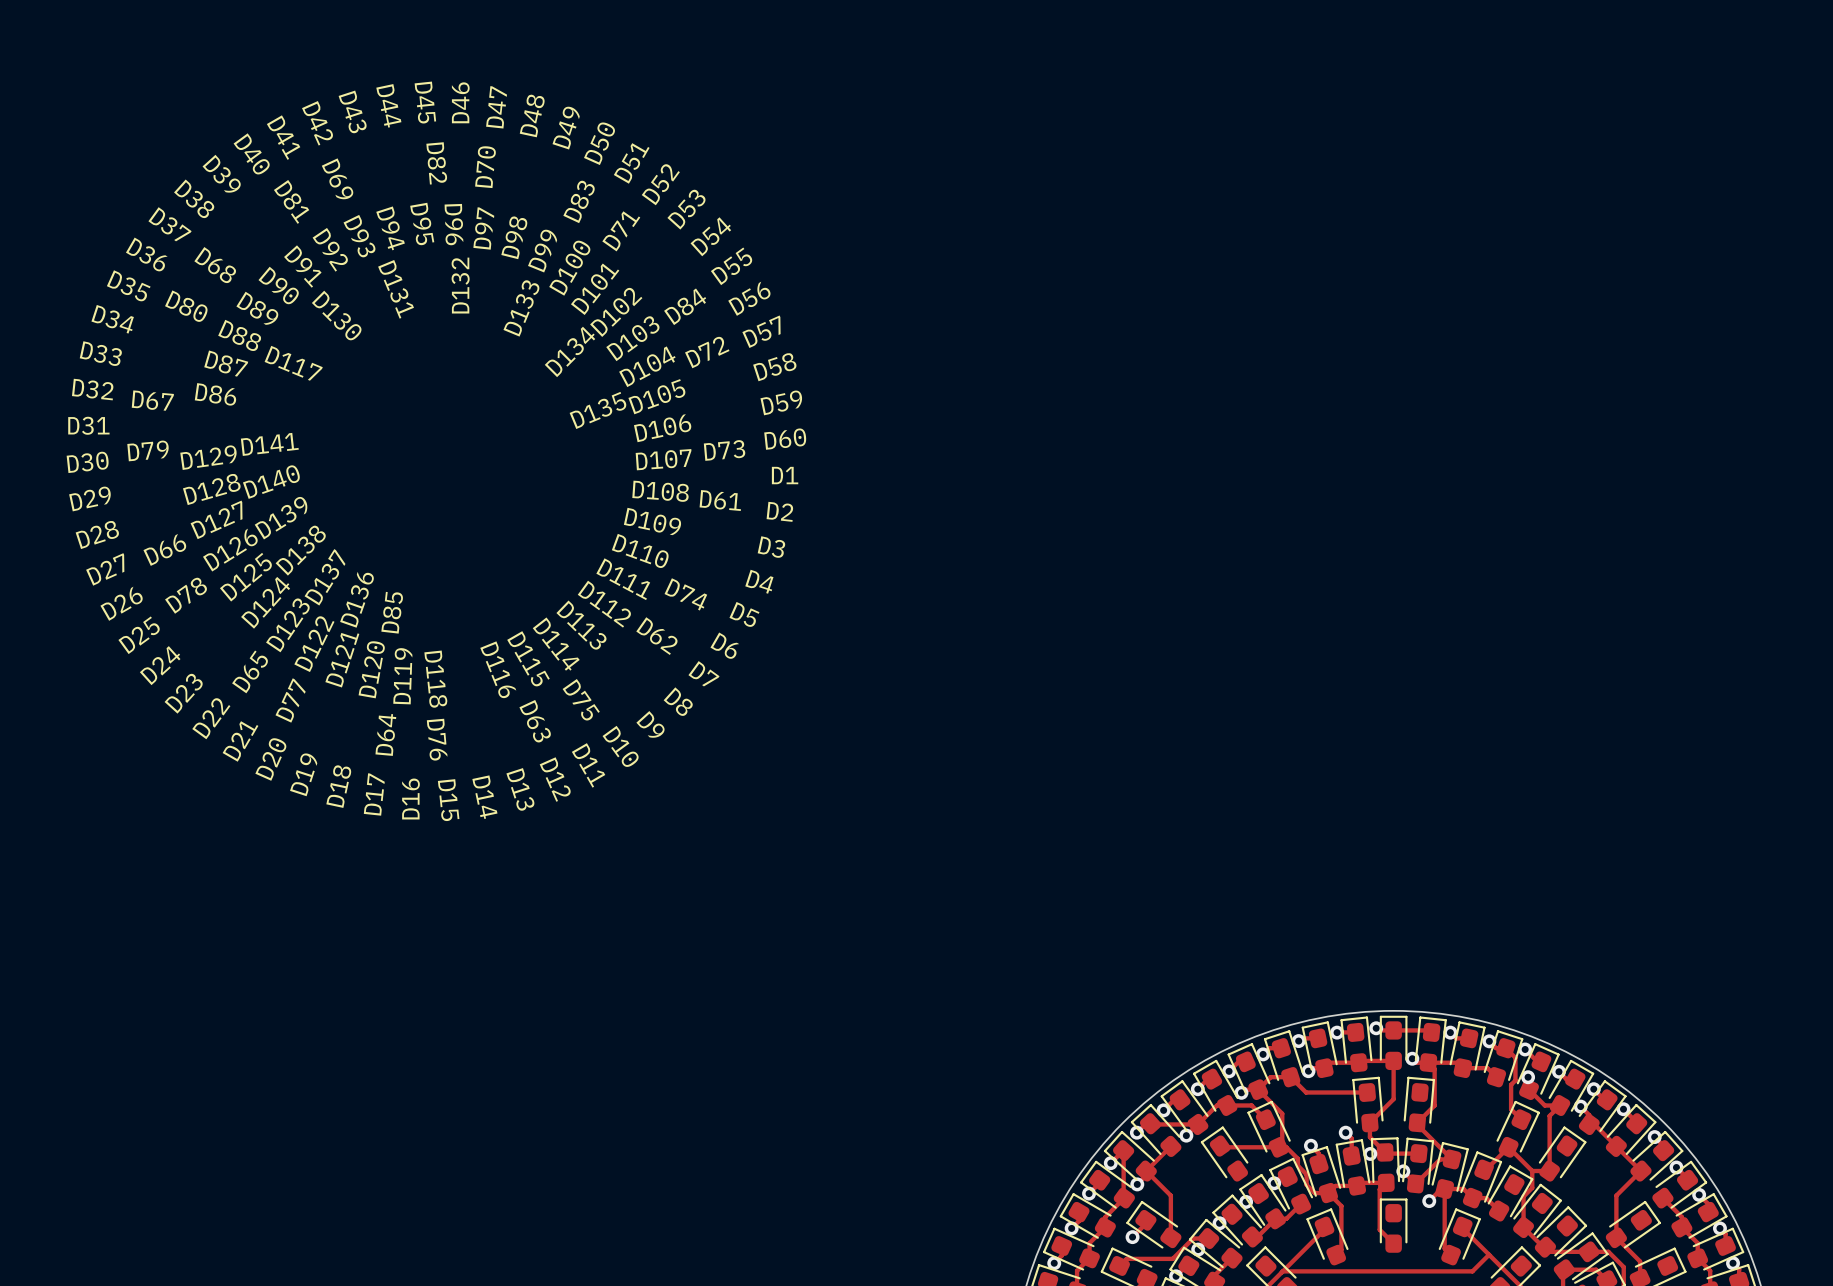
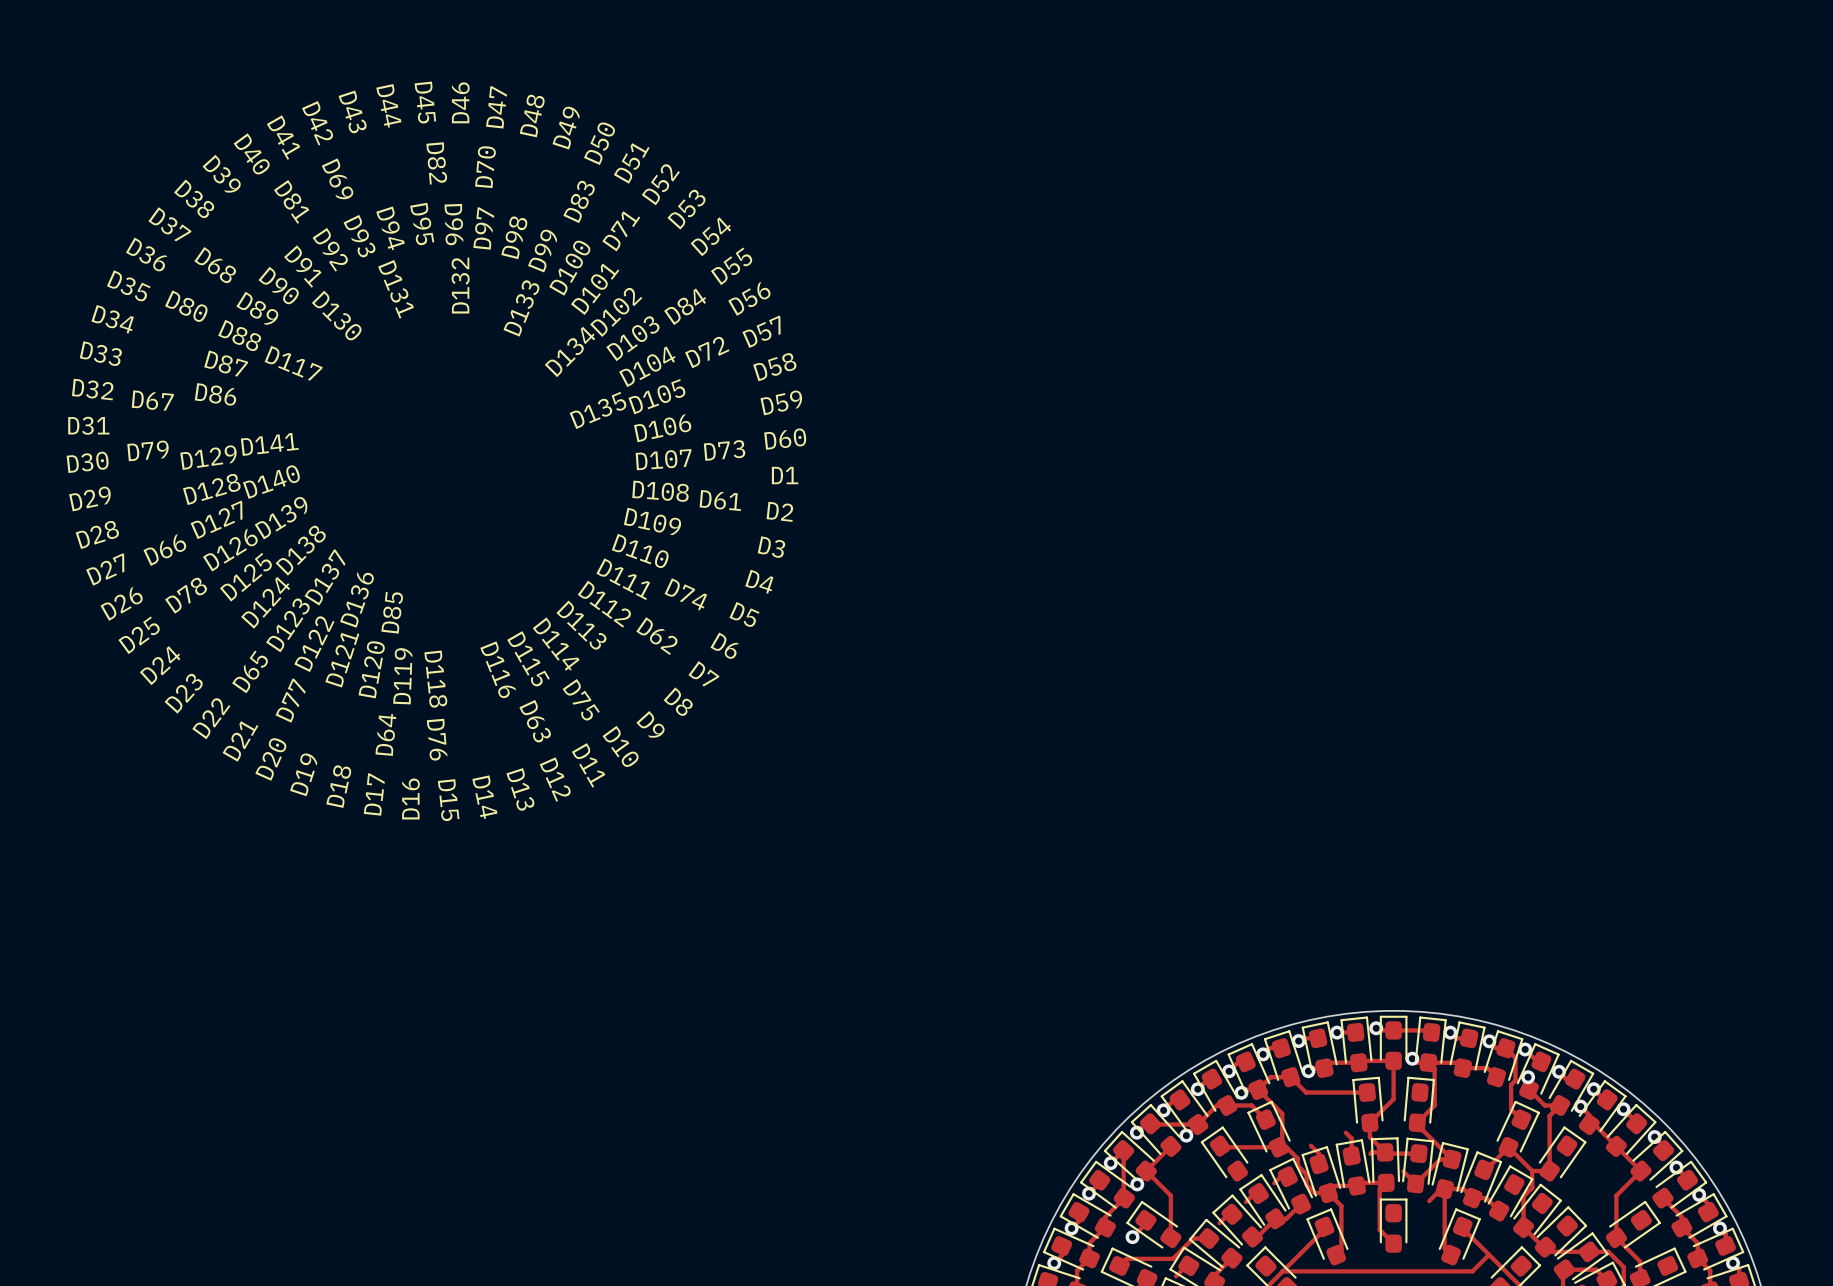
via: (1345, 1132) -> none
via: (1310, 1145) -> none
via: (1370, 1153) -> none
via: (1403, 1171) -> none
via: (1274, 1183) -> none
via: (1246, 1201) -> none
via: (1429, 1201) -> none
via: (1219, 1223) -> none
via: (1198, 1249) -> none
via: (1176, 1276) -> none

